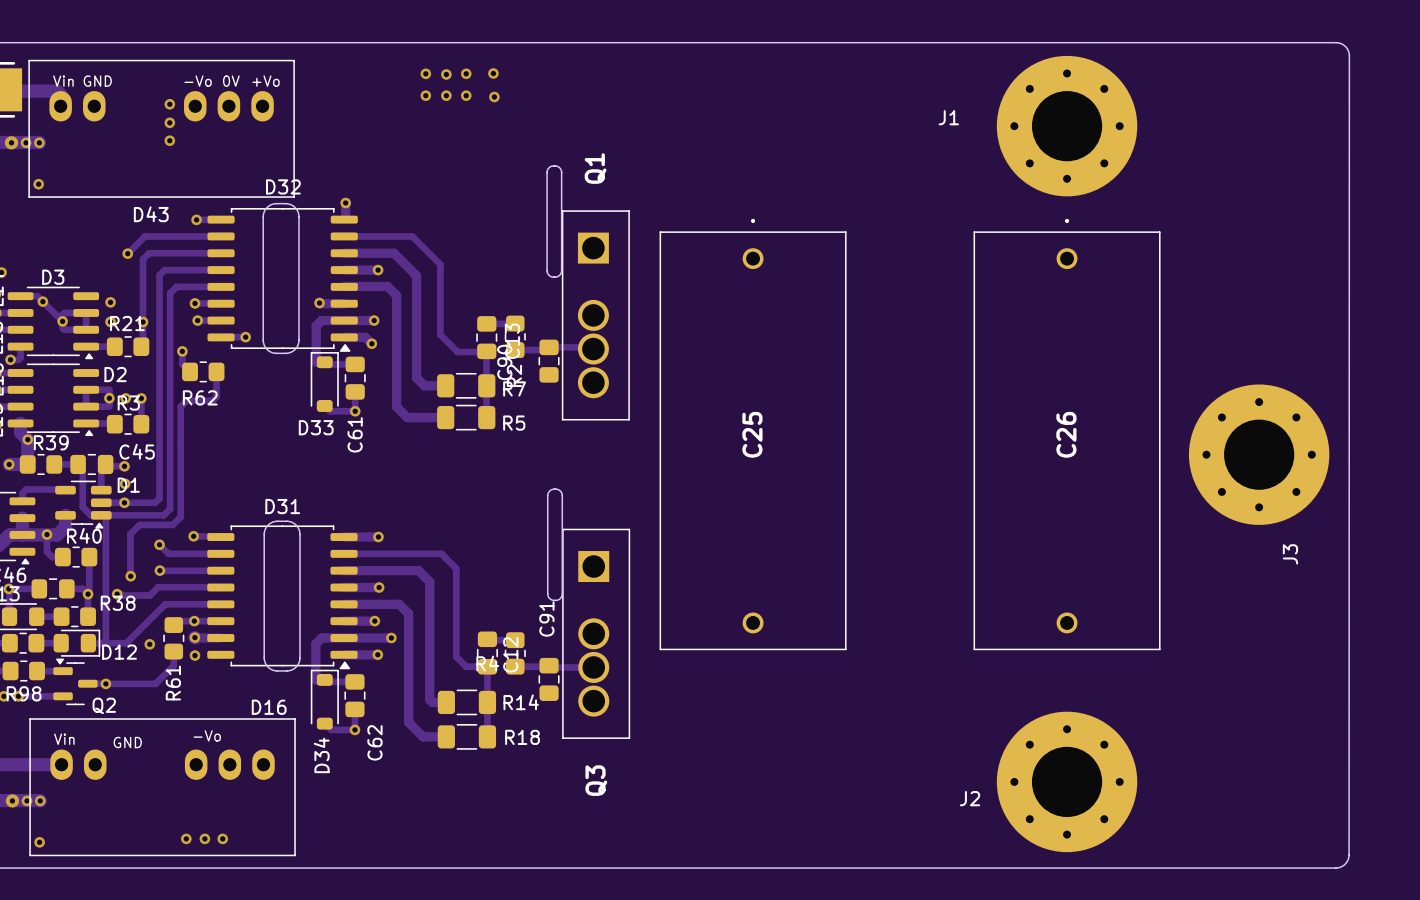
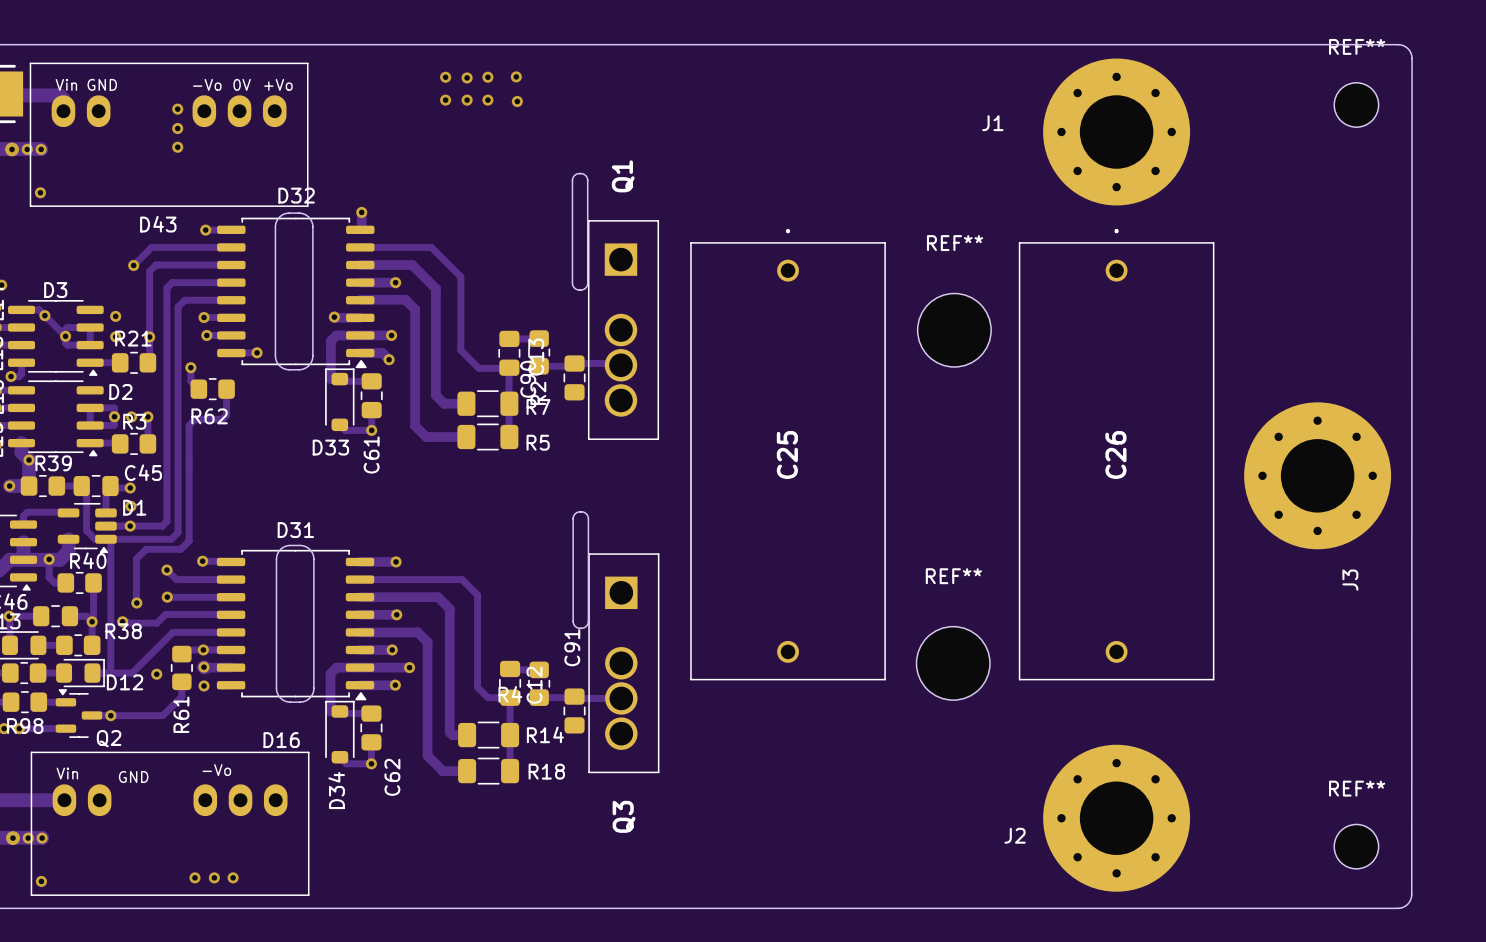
REF**: none -> (1356, 104)
REF**: none -> (954, 330)
REF**: none -> (953, 663)
REF**: none -> (1356, 846)

